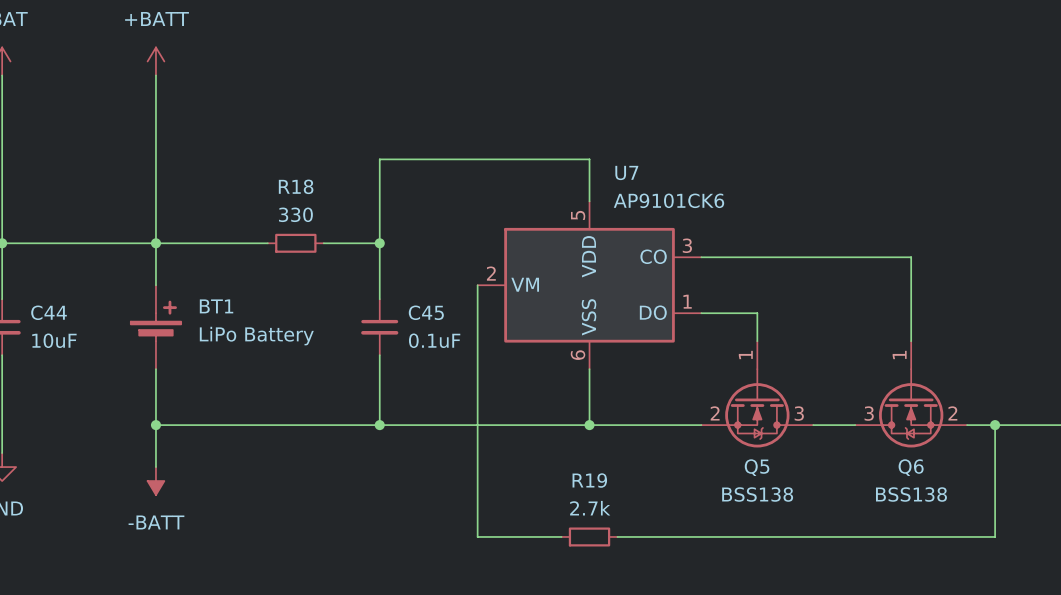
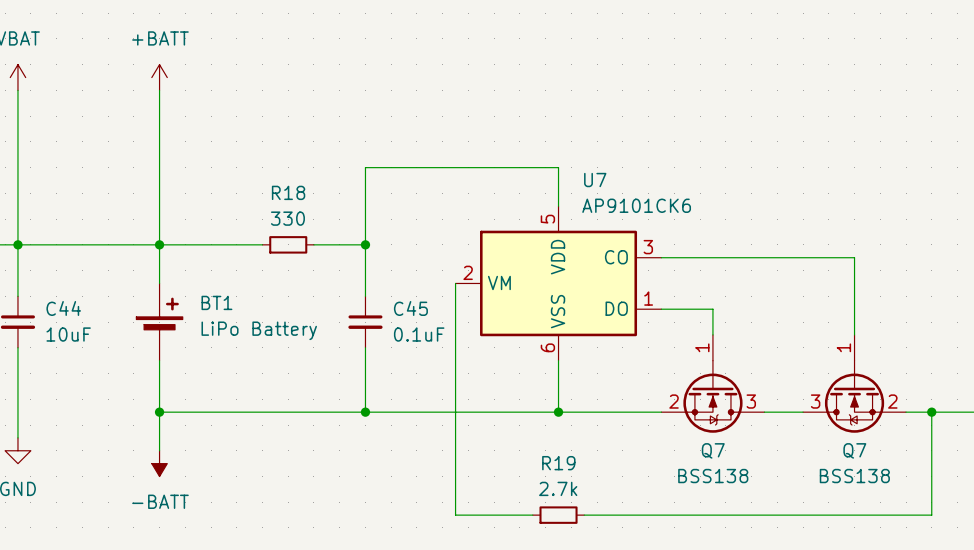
Q5 name: Q5 (757, 467) -> Q7 (713, 450)
Q6 name: Q6 (911, 467) -> Q7 (854, 450)

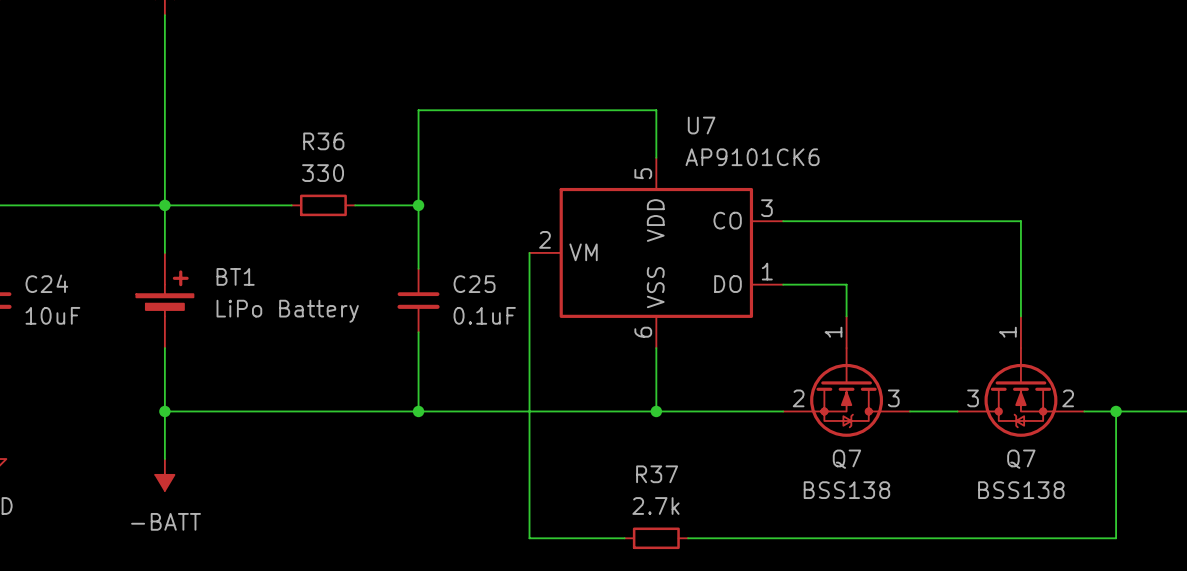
R18 name: R18 (288, 192) -> R36 (323, 141)
C44 name: C44 (63, 308) -> C24 (46, 283)
C45 name: C45 (410, 308) -> C25 (474, 284)
R19 name: R19 (558, 463) -> R37 (657, 474)

